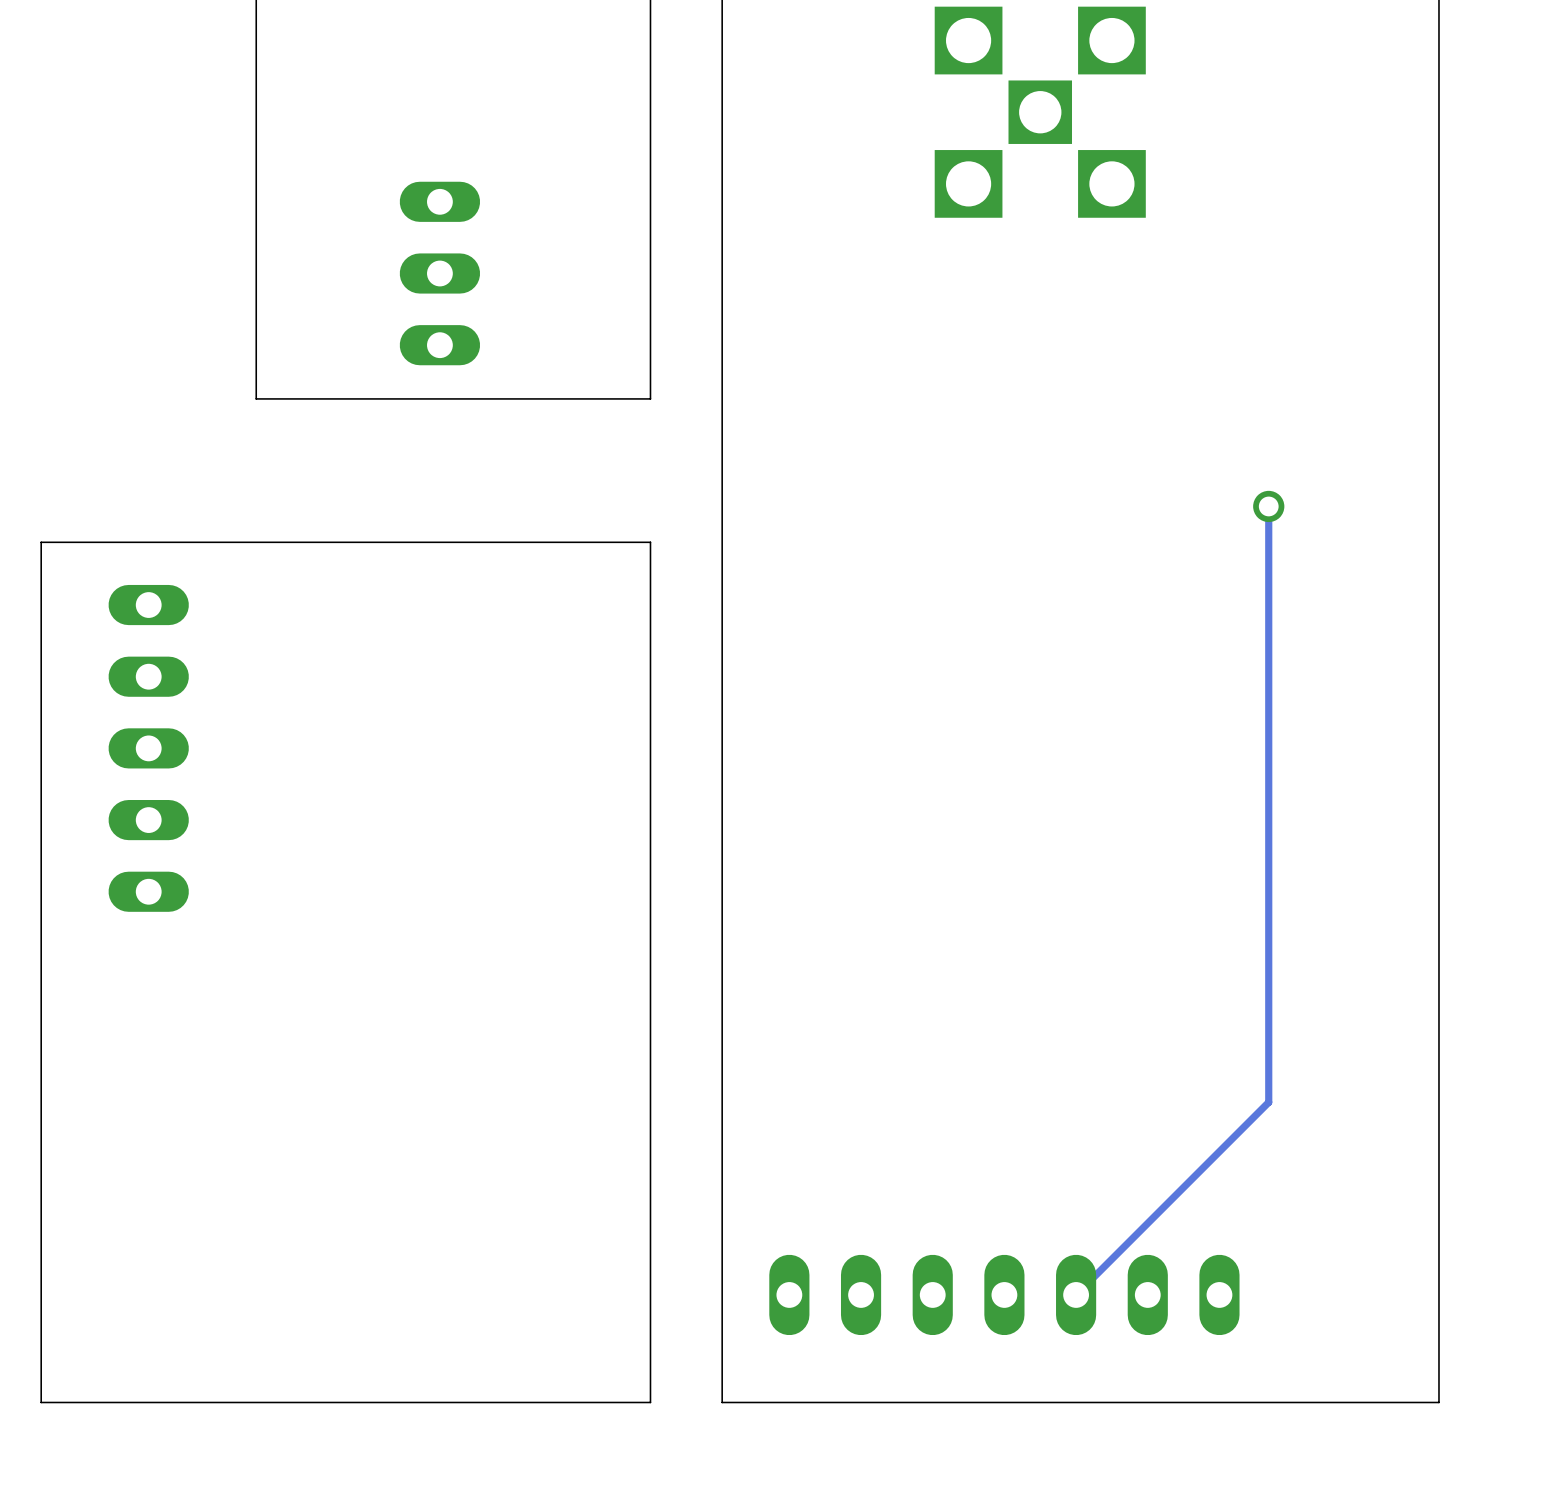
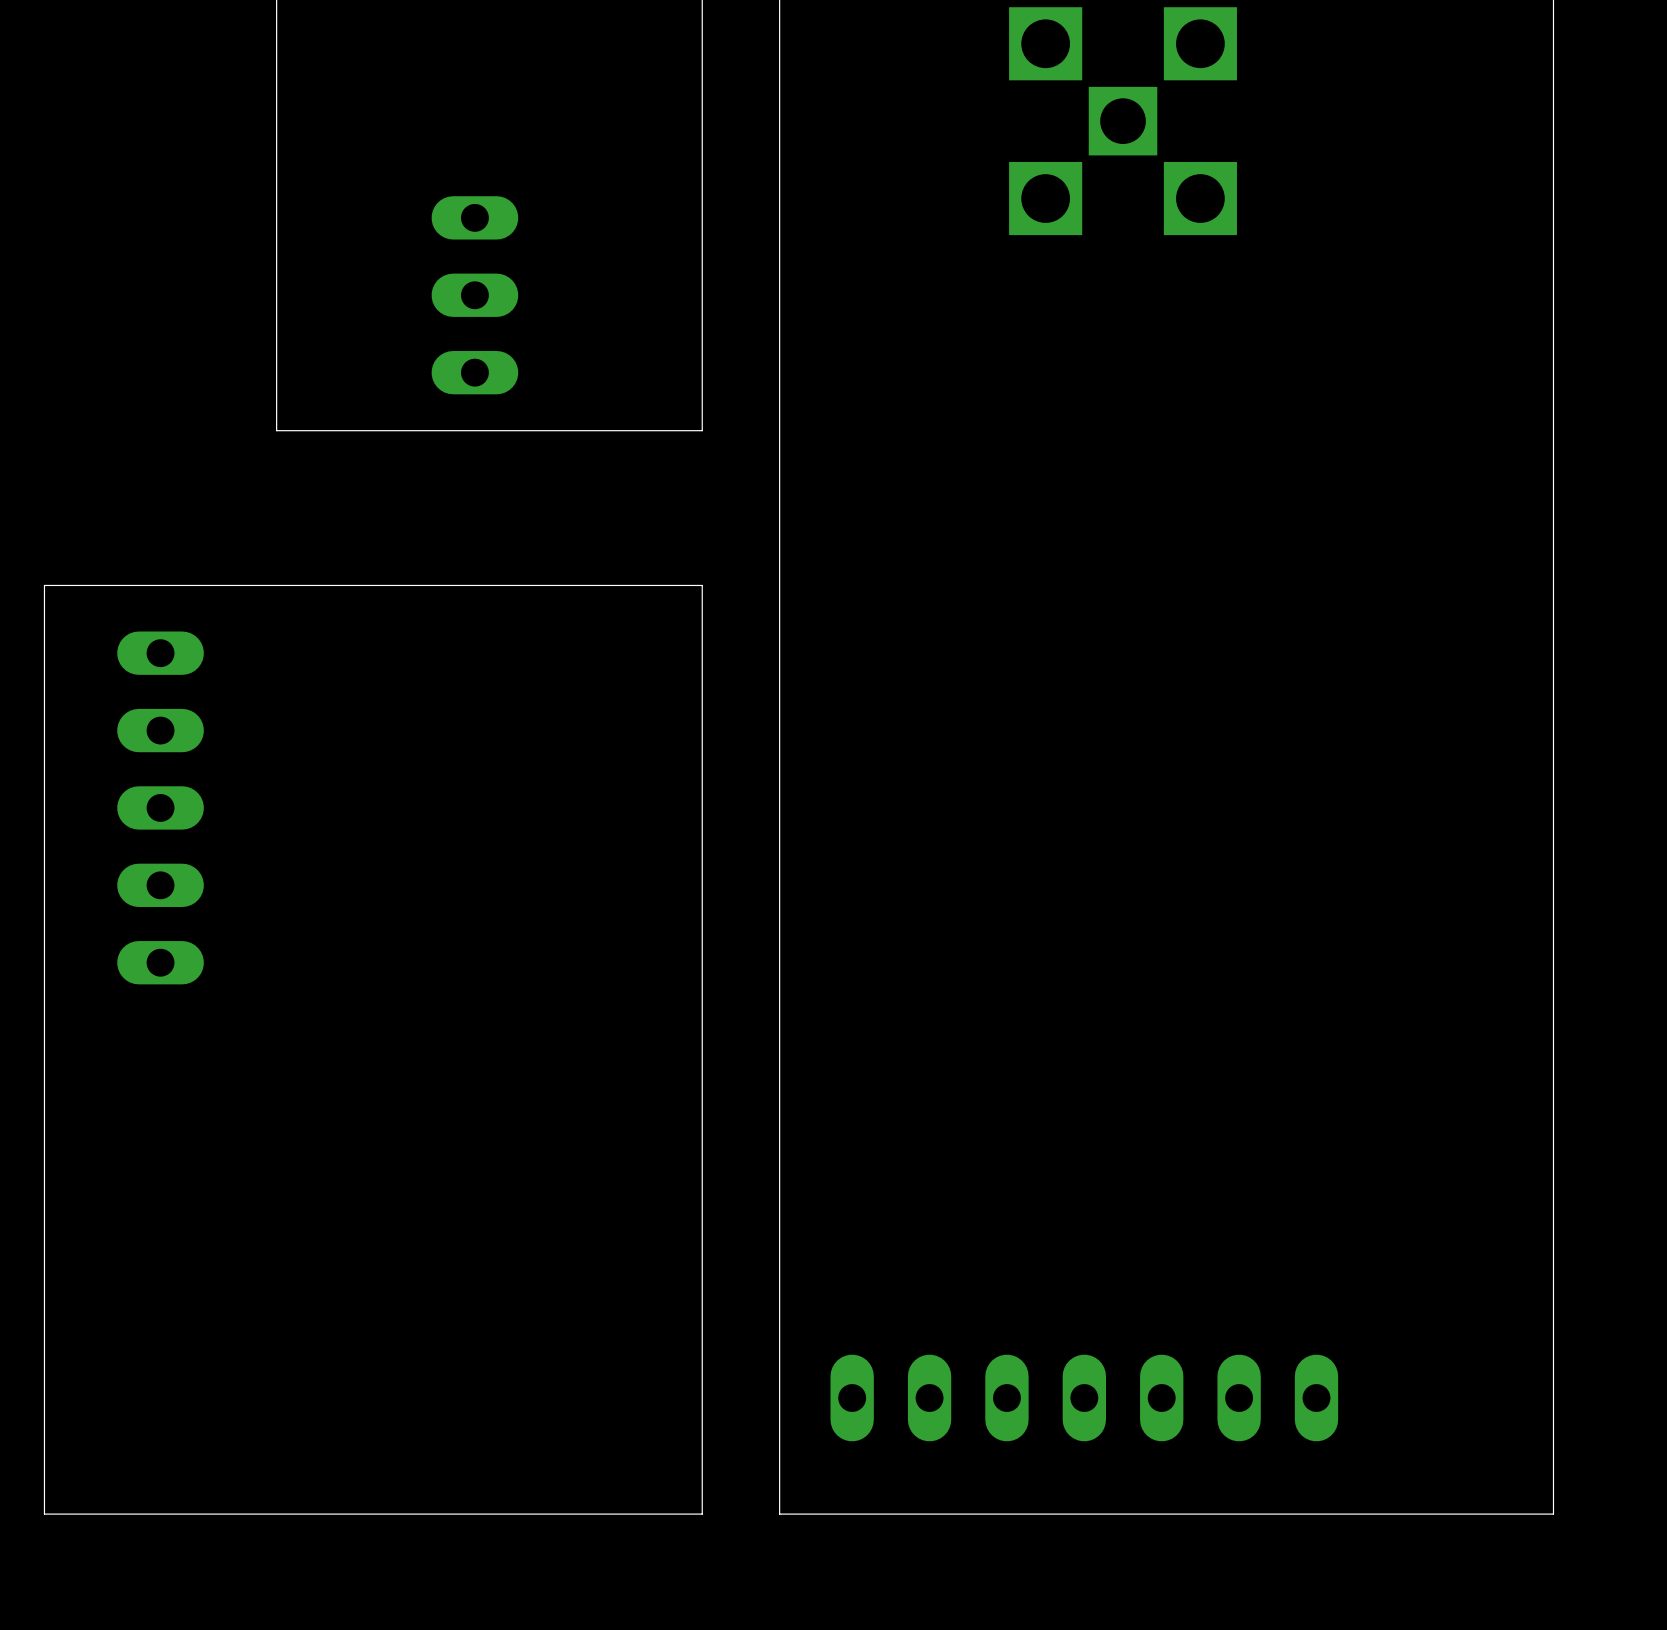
track: (1268, 506) (1268, 1102) (1076, 1294) -> none
via: (1268, 506) -> none

